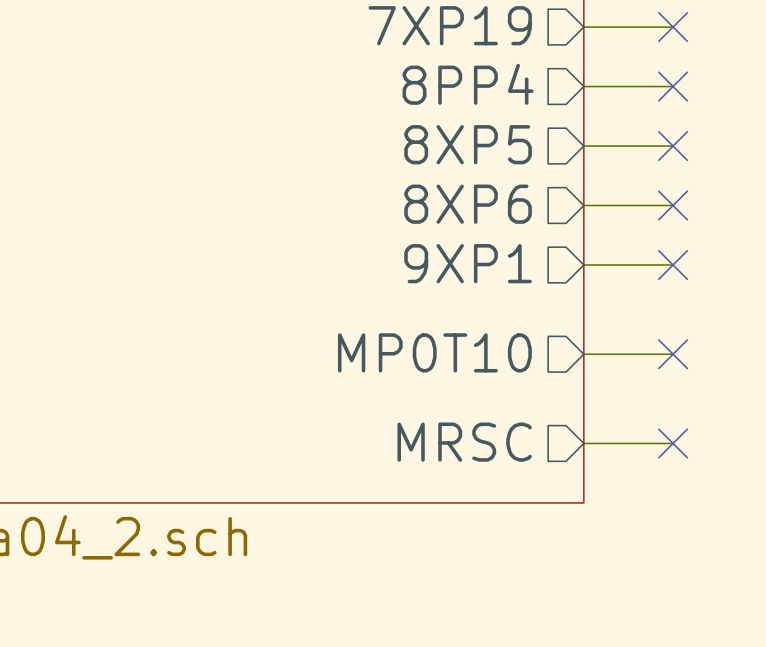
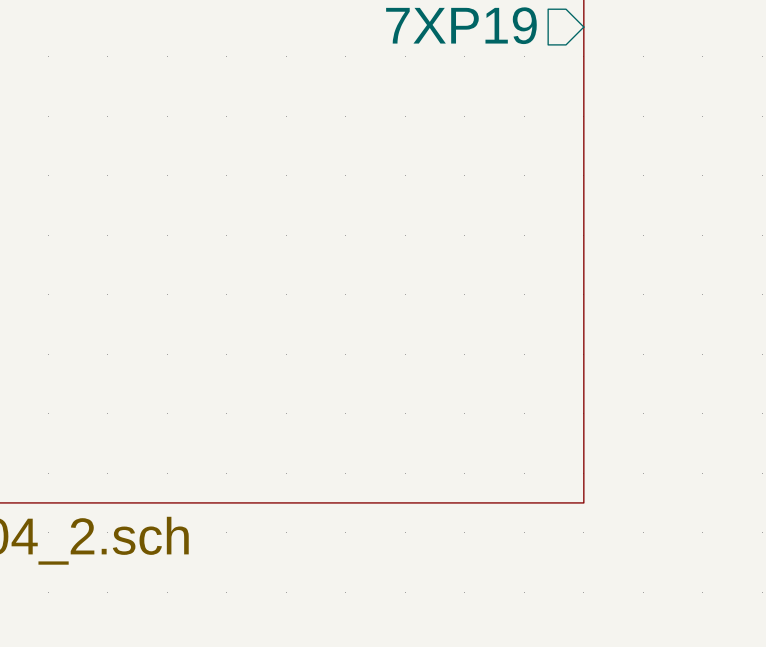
wire: (583, 27) (673, 27) -> none
no-connect mark: (673, 27) -> none
sheet pin: 8PP4 (468, 84) -> none
wire: (583, 86) (673, 86) -> none
no-connect mark: (673, 86) -> none
sheet pin: 8XP5 (468, 144) -> none
wire: (583, 146) (673, 146) -> none
no-connect mark: (673, 146) -> none
sheet pin: 8XP6 (468, 204) -> none
wire: (583, 205) (673, 205) -> none
no-connect mark: (673, 205) -> none
sheet pin: 9XP1 (468, 263) -> none
wire: (583, 265) (673, 265) -> none
no-connect mark: (673, 265) -> none
sheet pin: MP0T10 (434, 352) -> none
wire: (583, 354) (673, 354) -> none
no-connect mark: (673, 354) -> none
sheet pin: MRSC (464, 442) -> none
wire: (583, 443) (673, 443) -> none
no-connect mark: (673, 443) -> none

